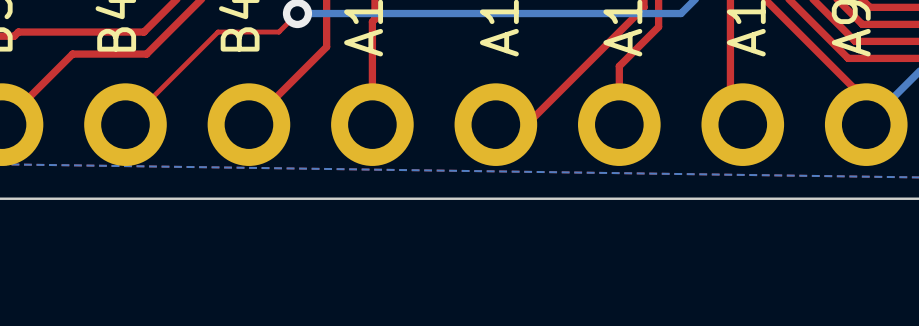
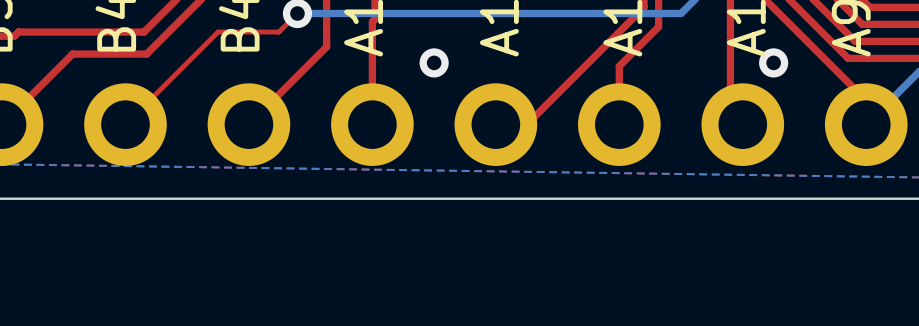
via: none -> (434, 62)
via: none -> (773, 62)

